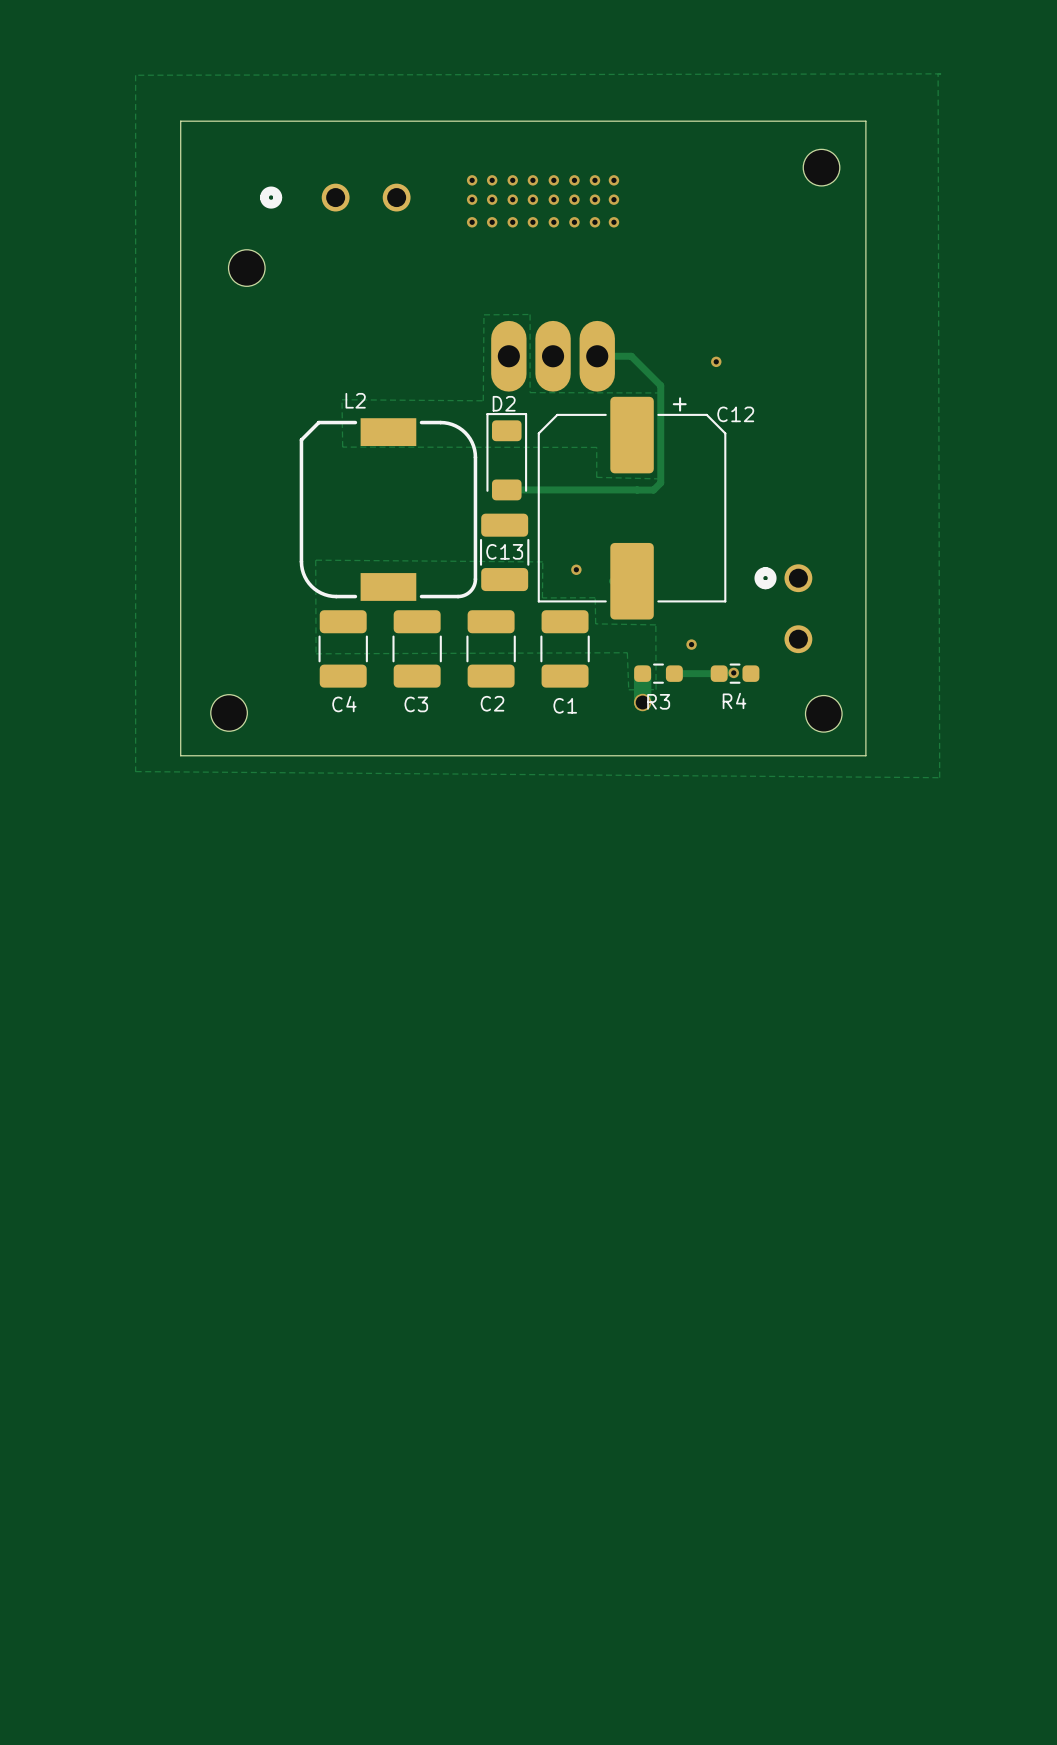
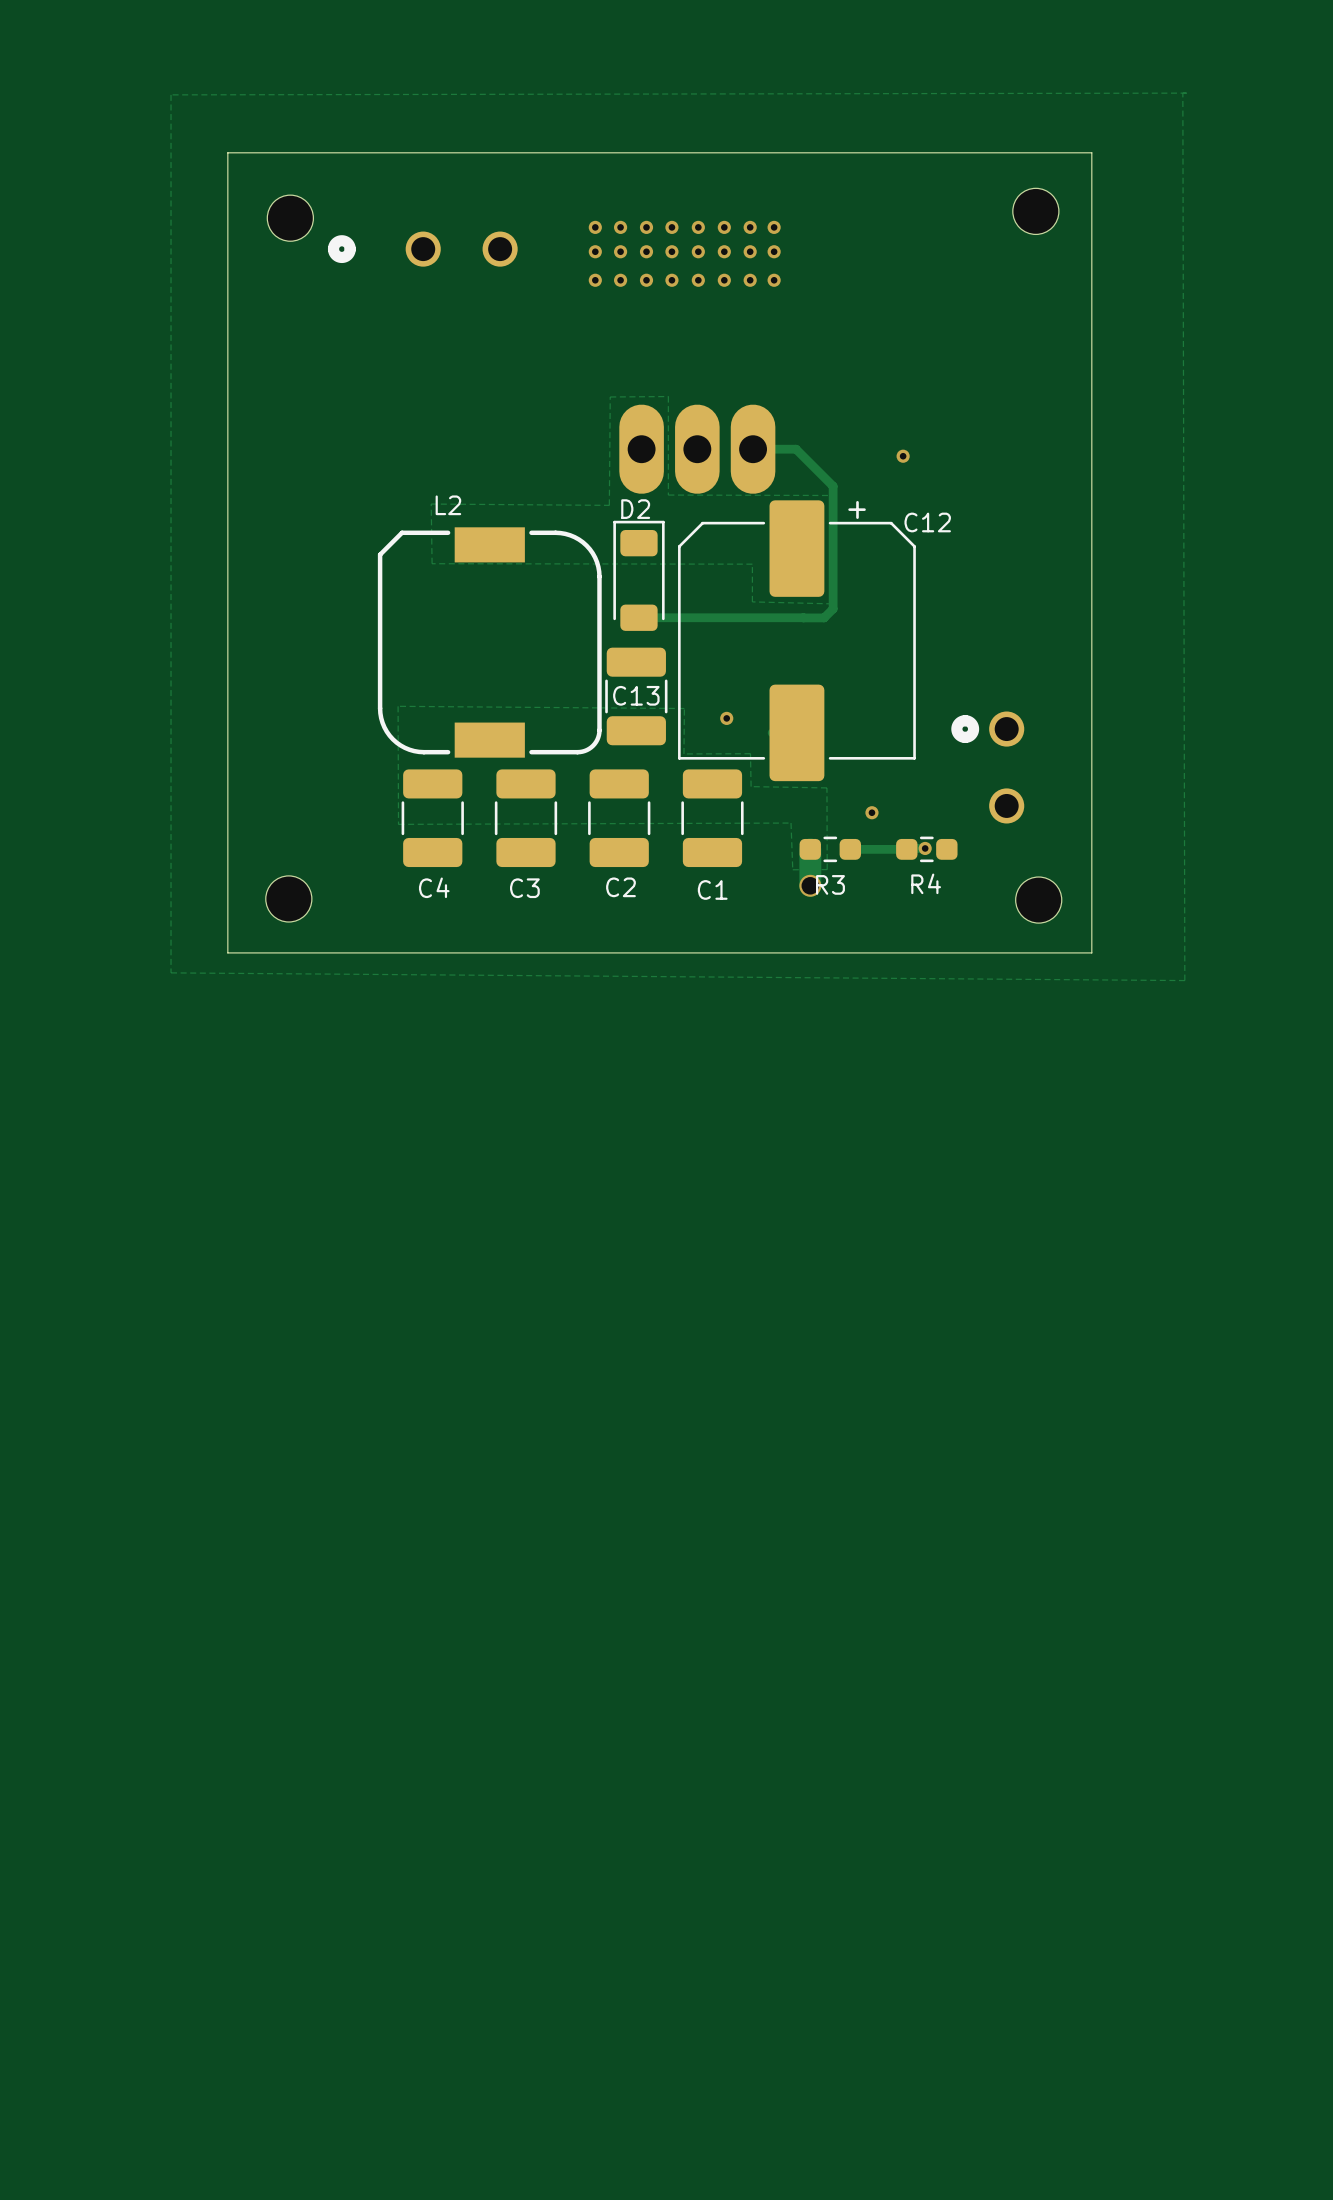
part position: (246, 268) -> (290, 218)

